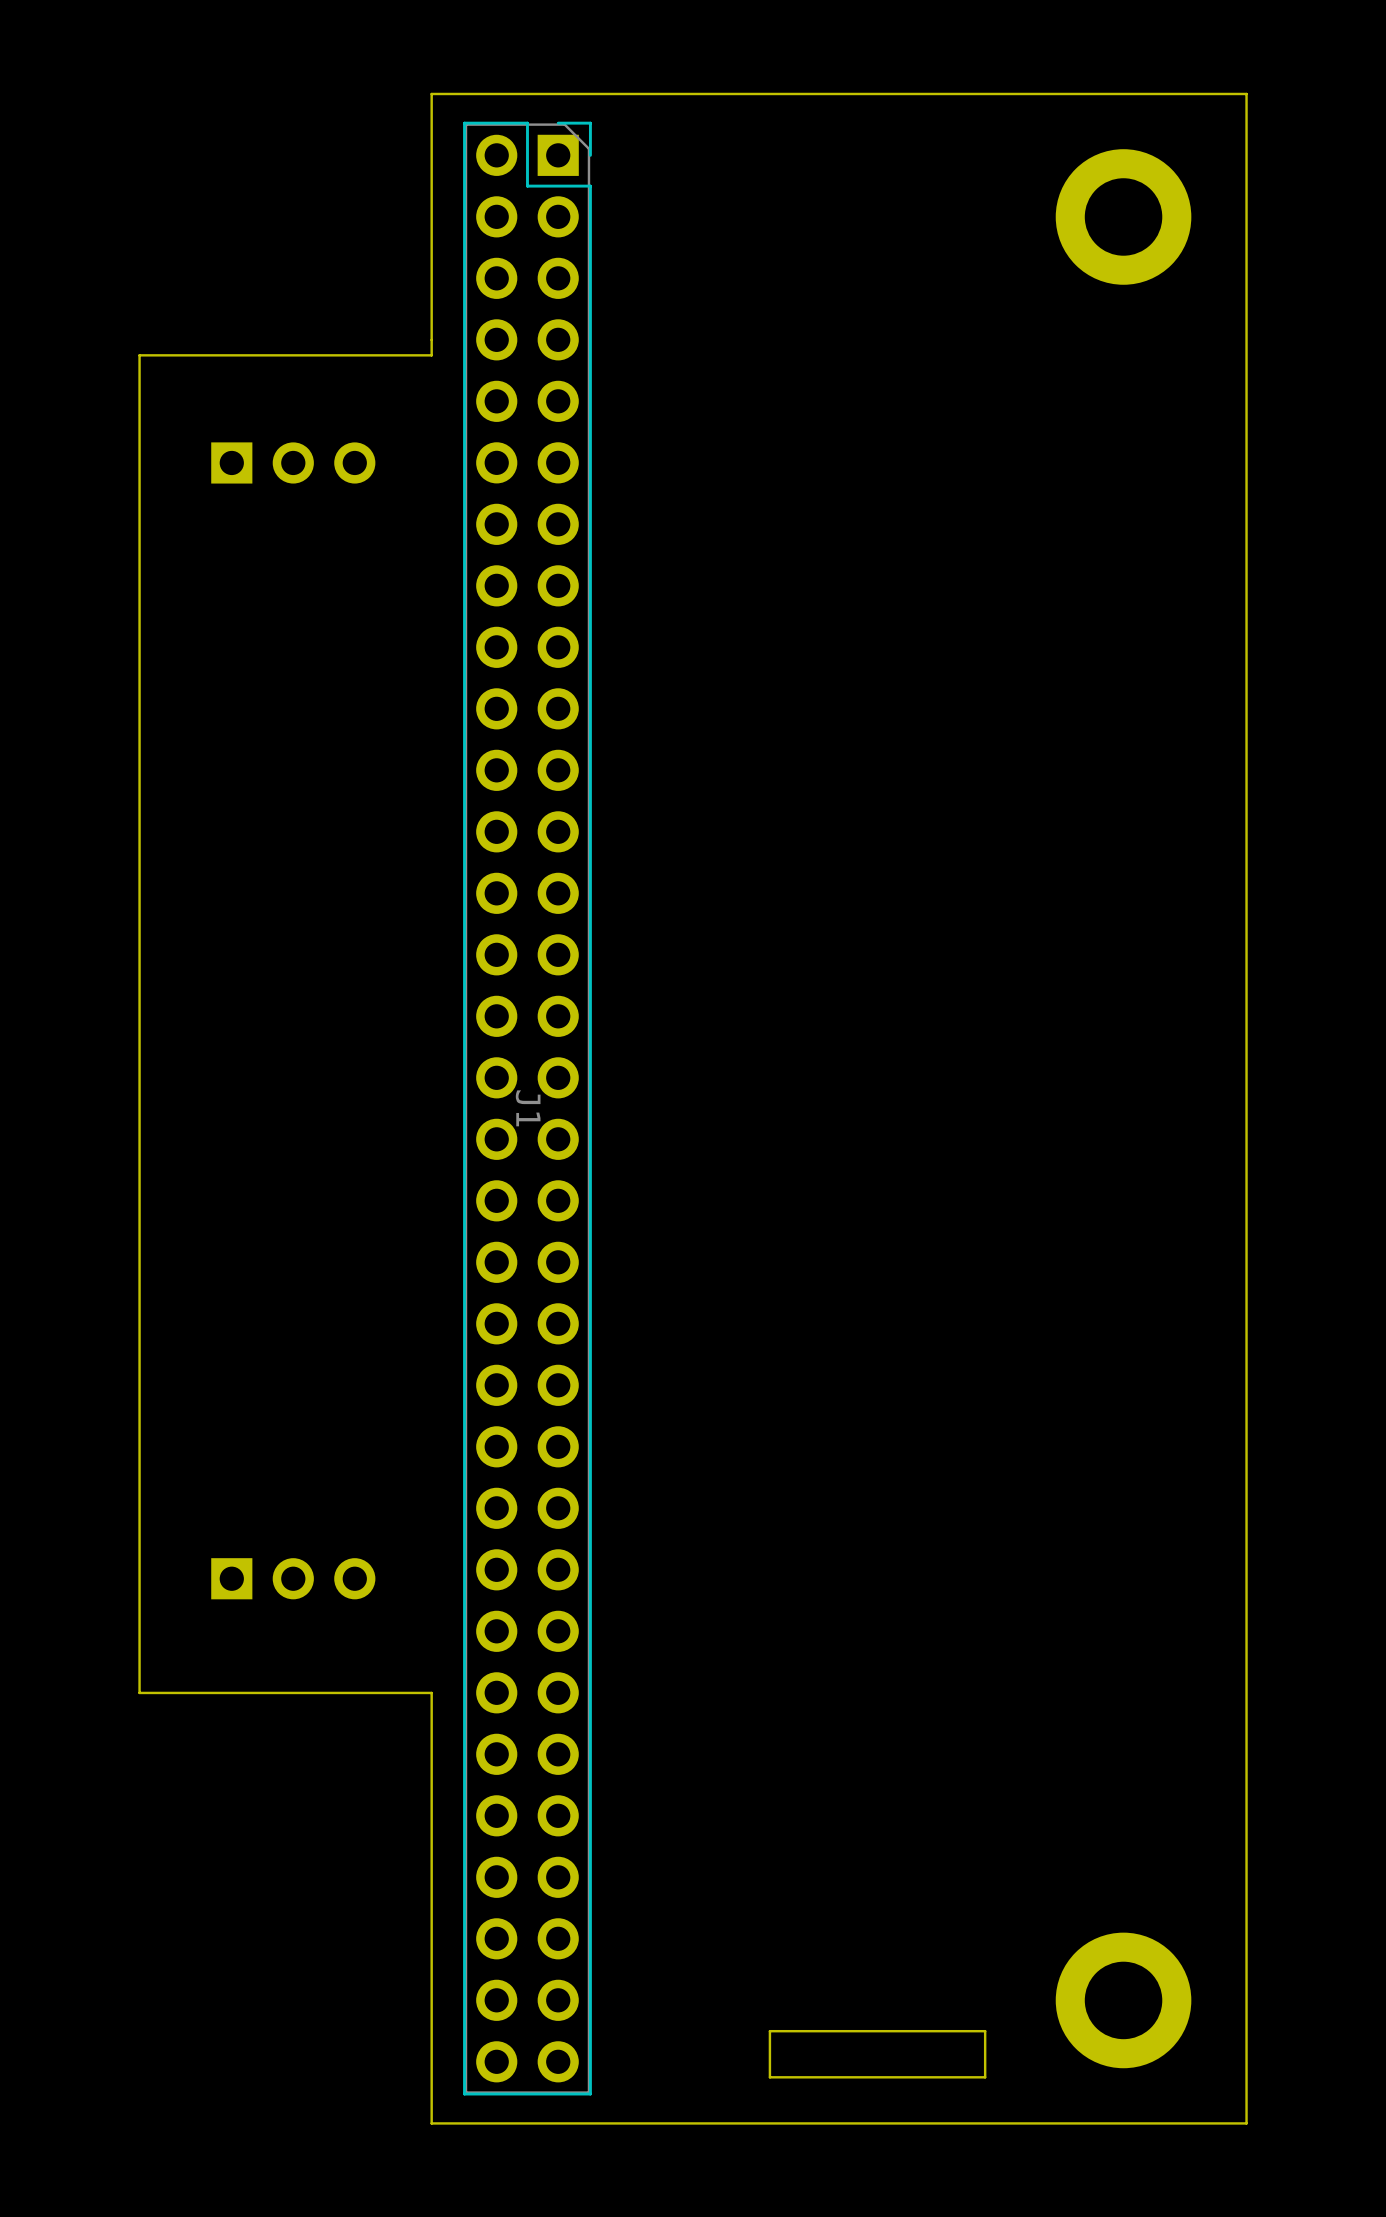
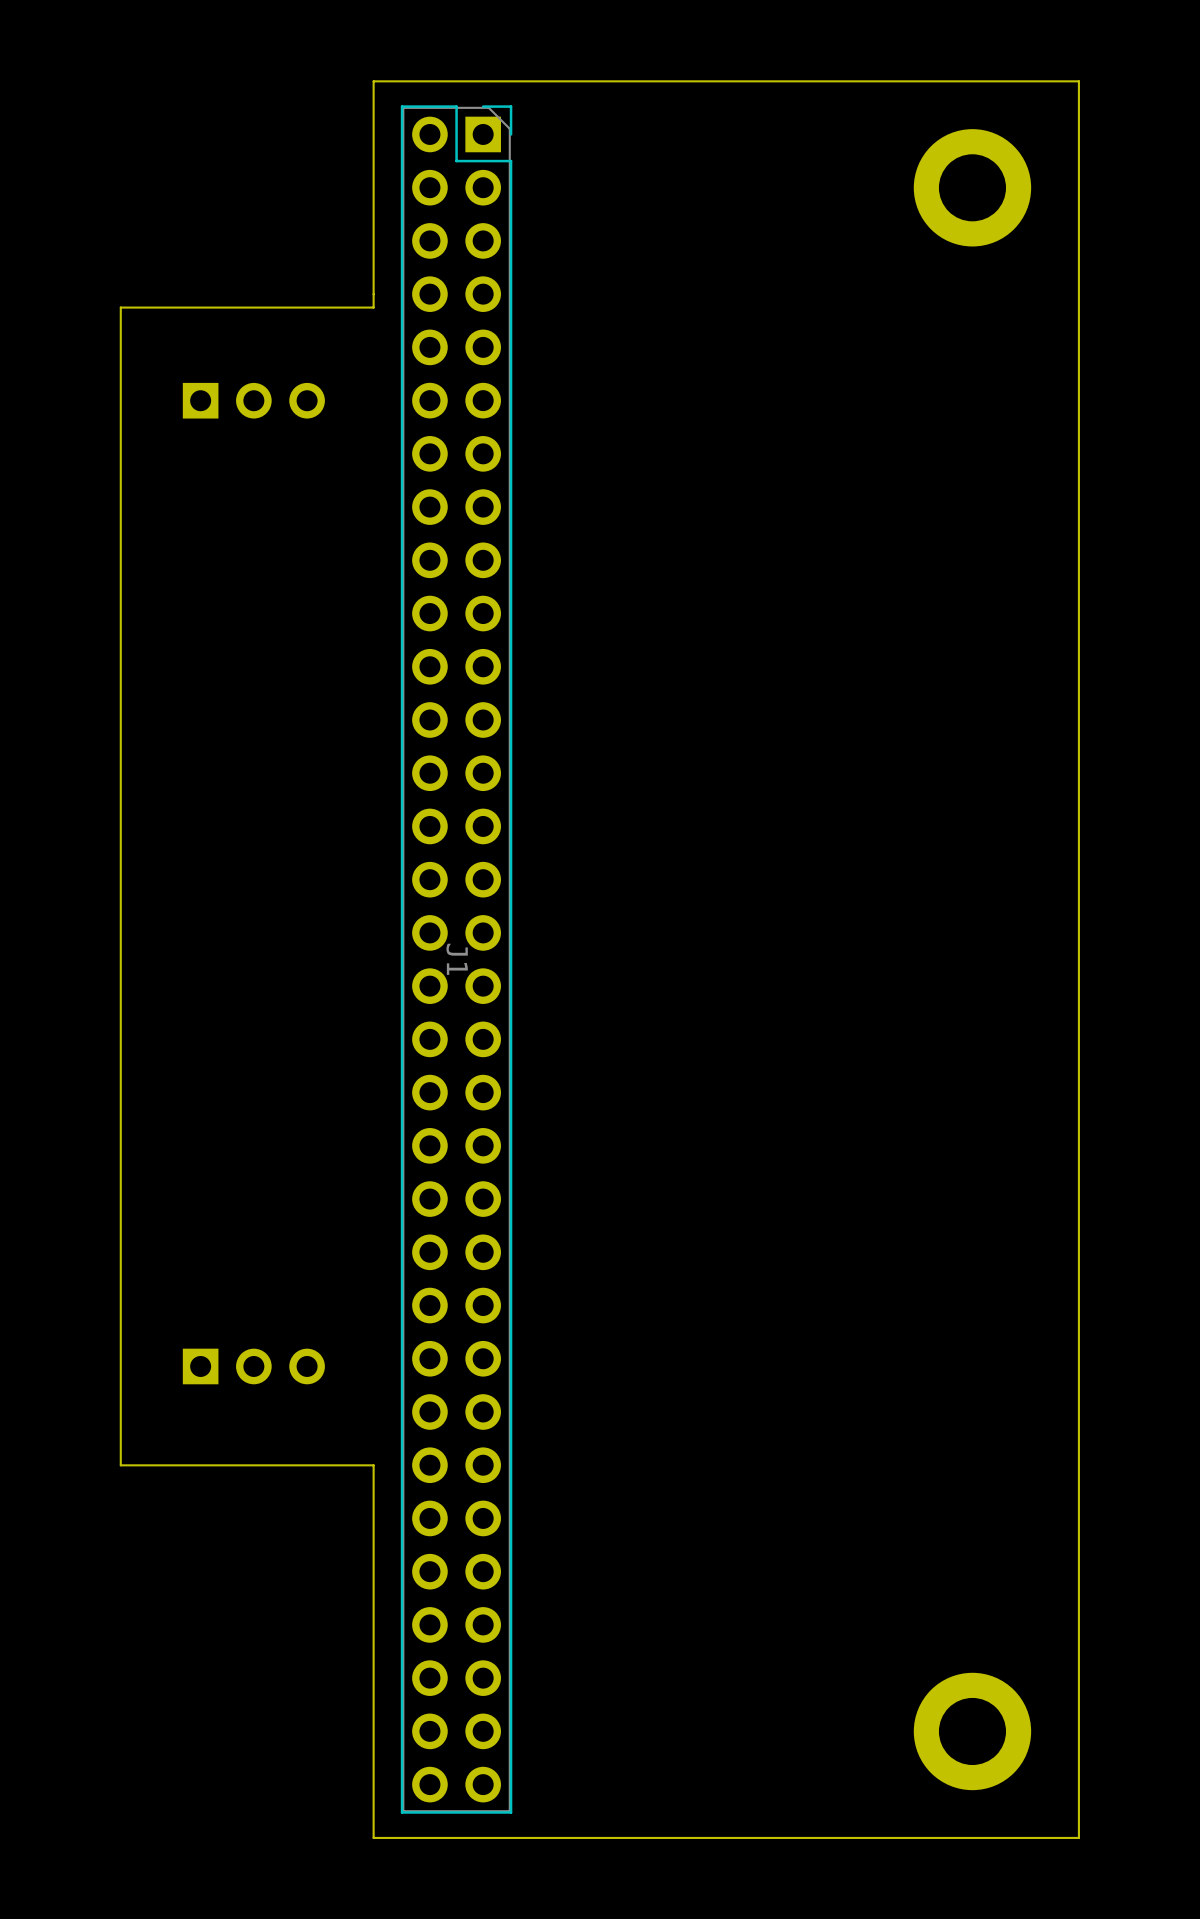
board edge: (985, 2031) (769, 2031) (769, 2077) (985, 2077) (985, 2031) -> none

